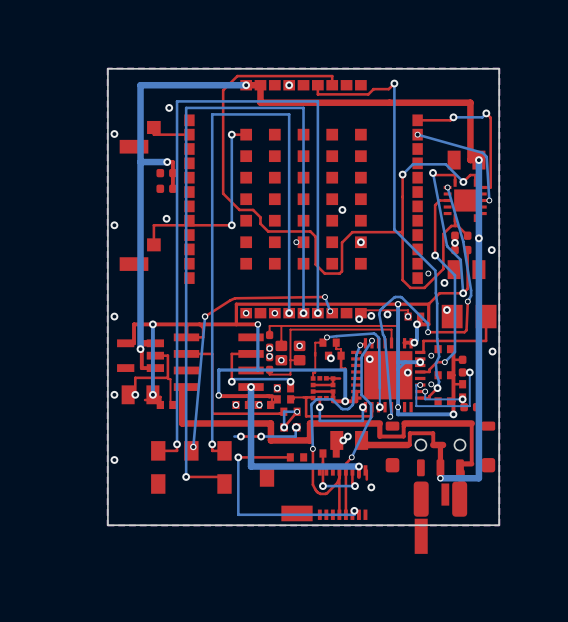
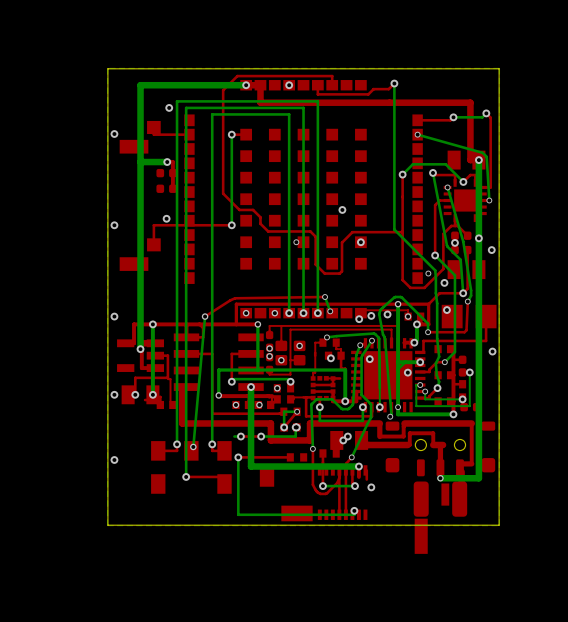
via: (431, 355) -> none
via: (431, 384) -> none

